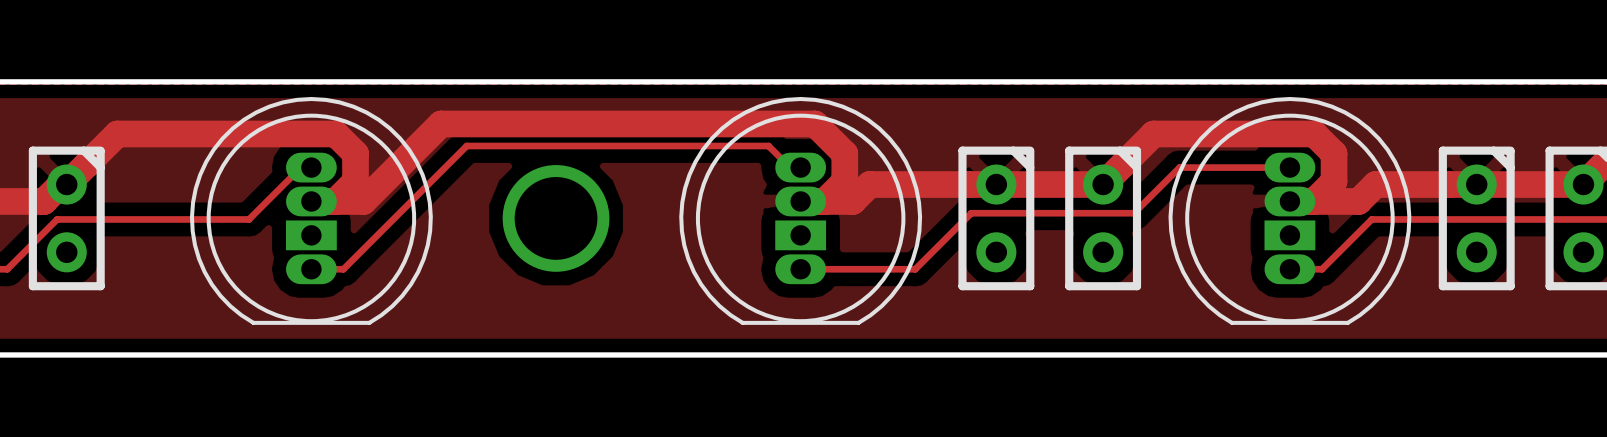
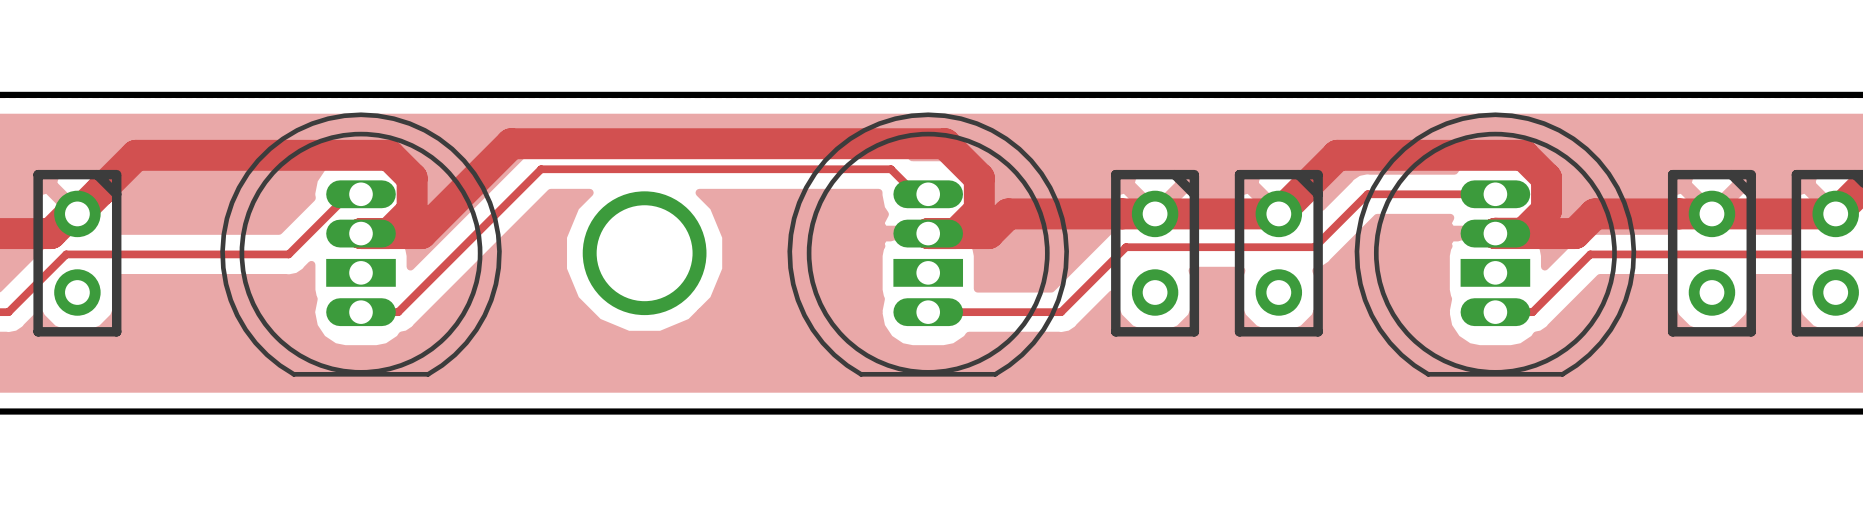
part footprint: [189, 96, 433, 325] -> [220, 112, 502, 377]
part footprint: [679, 96, 923, 325] -> [787, 112, 1069, 377]
part footprint: [1168, 96, 1412, 325] -> [1354, 112, 1637, 377]

